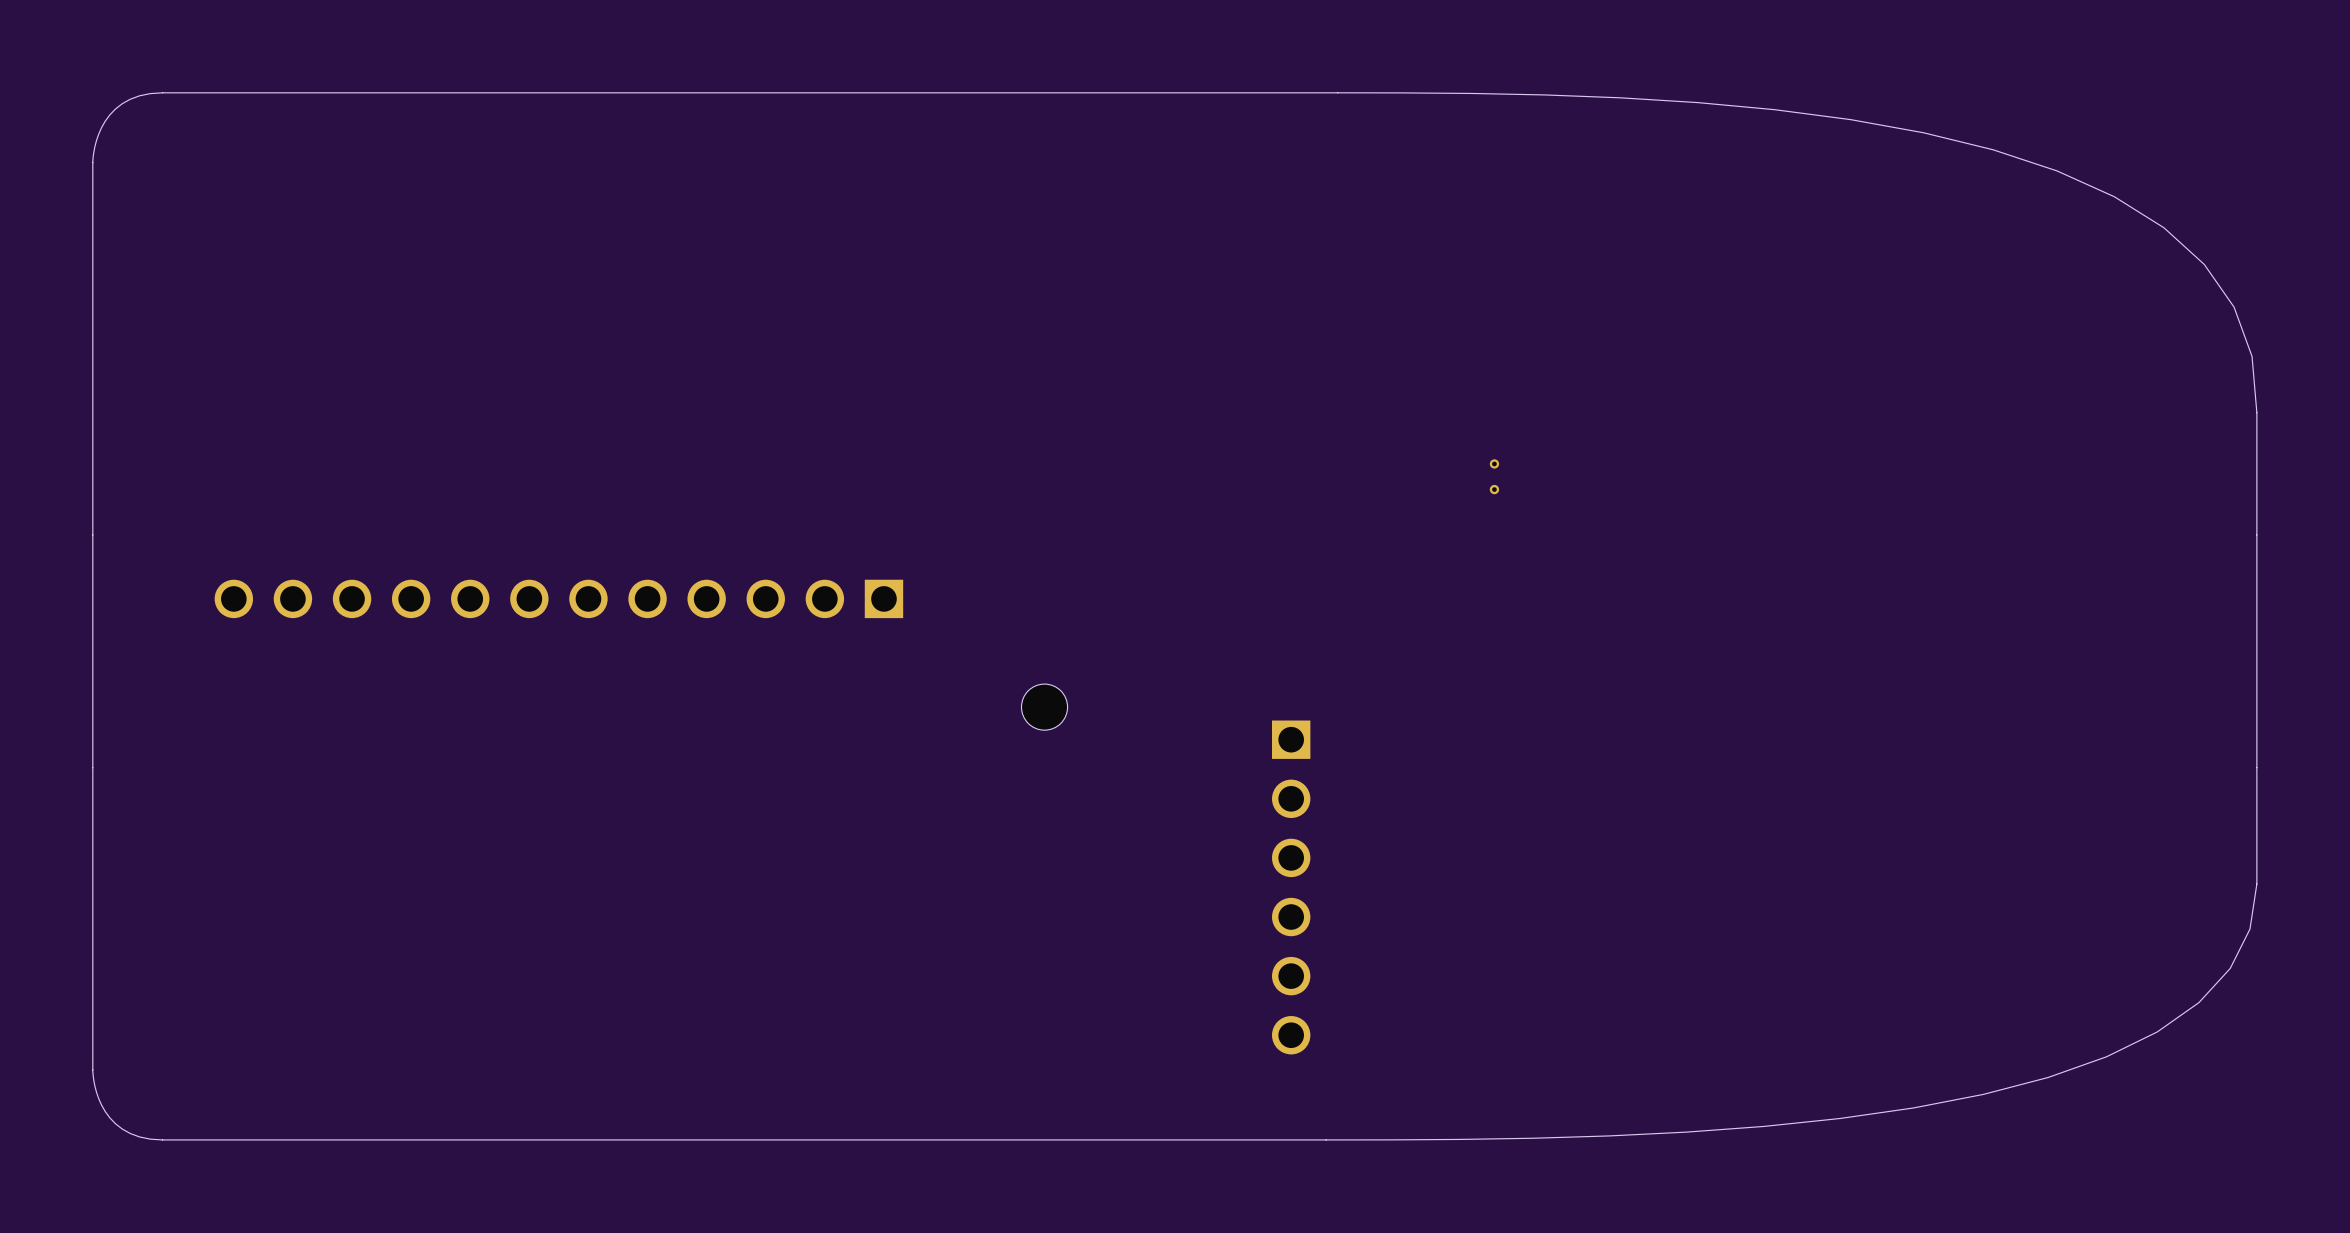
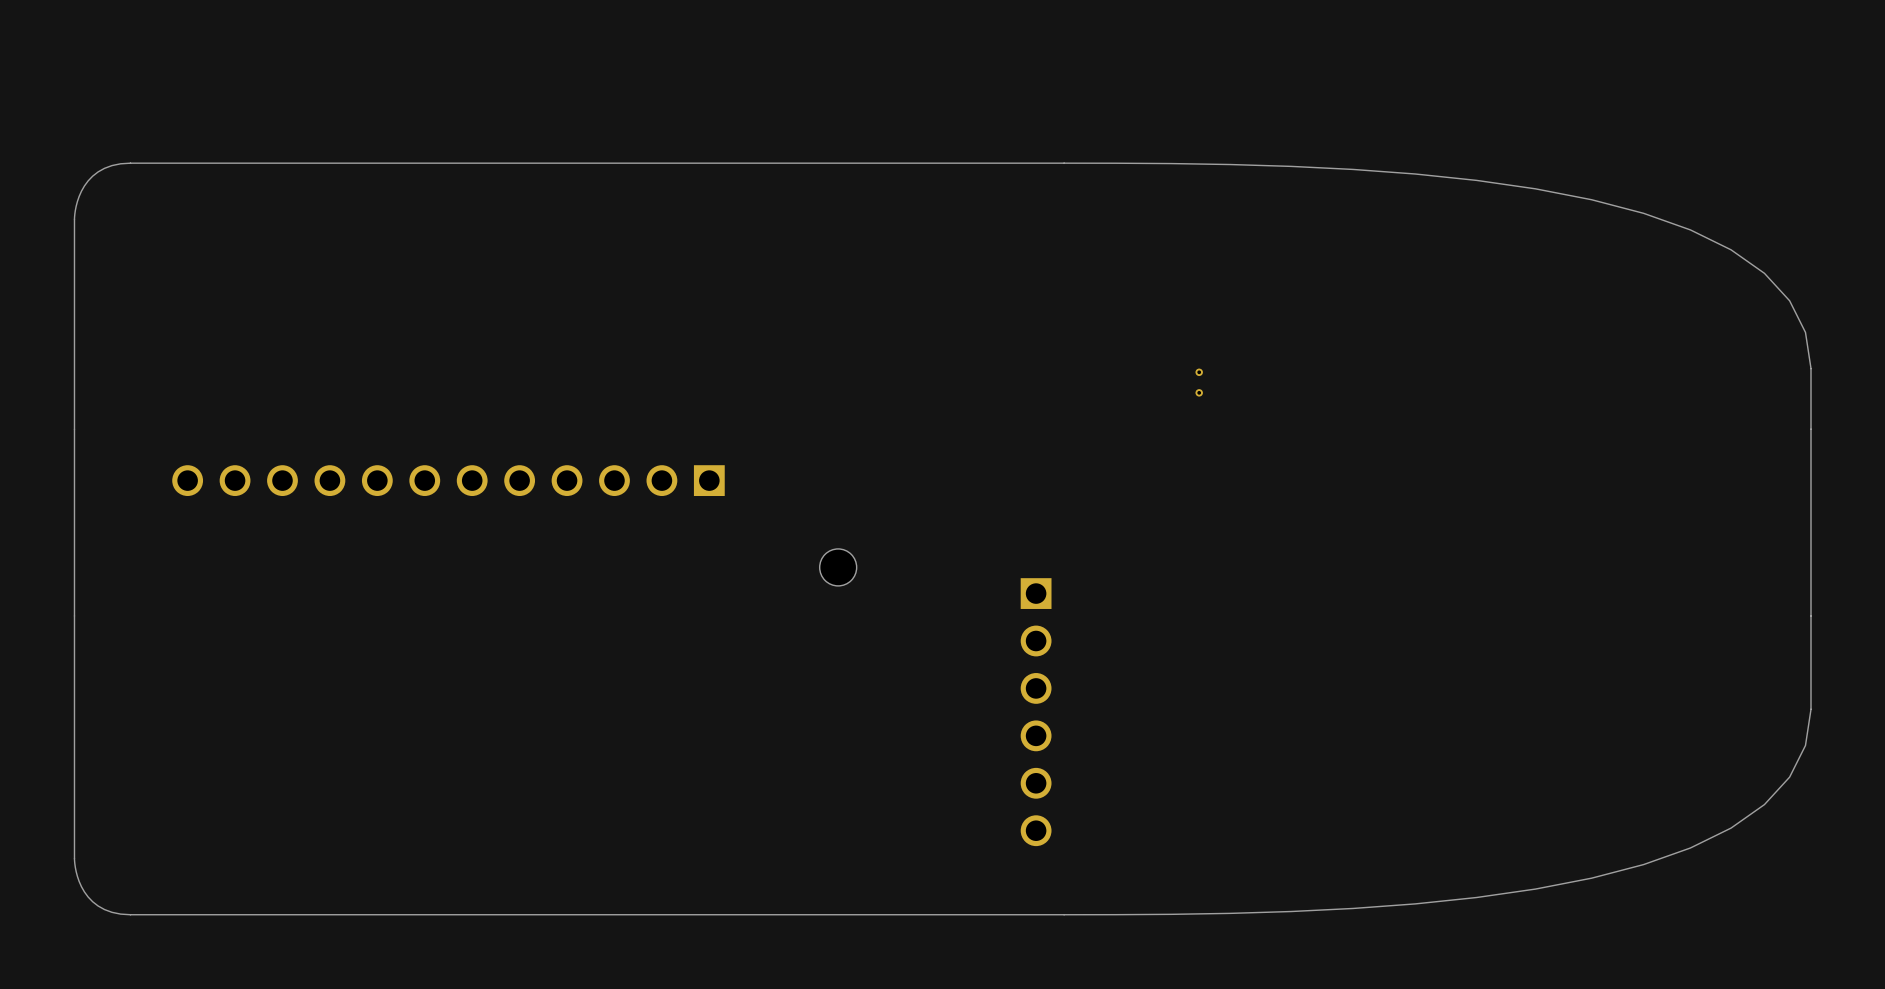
board edge: (92, 273) (92, 161) (96, 140) (105, 121) (115, 109) (130, 99) (150, 93) (1401, 92) (1544, 94) (1697, 102) (1850, 119) (1923, 132) (1993, 149) (2057, 170) (2114, 196) (2163, 227) (2204, 264) (2234, 307) (2252, 356) (2256, 412) (2256, 459) -> (74, 219) (79, 196) (92, 176) (112, 165) (130, 163) (1171, 163) (1291, 166) (1415, 174) (1535, 188) (1591, 199) (1643, 213) (1690, 229) (1731, 249) (1764, 273) (1789, 300) (1805, 332) (1811, 368)

